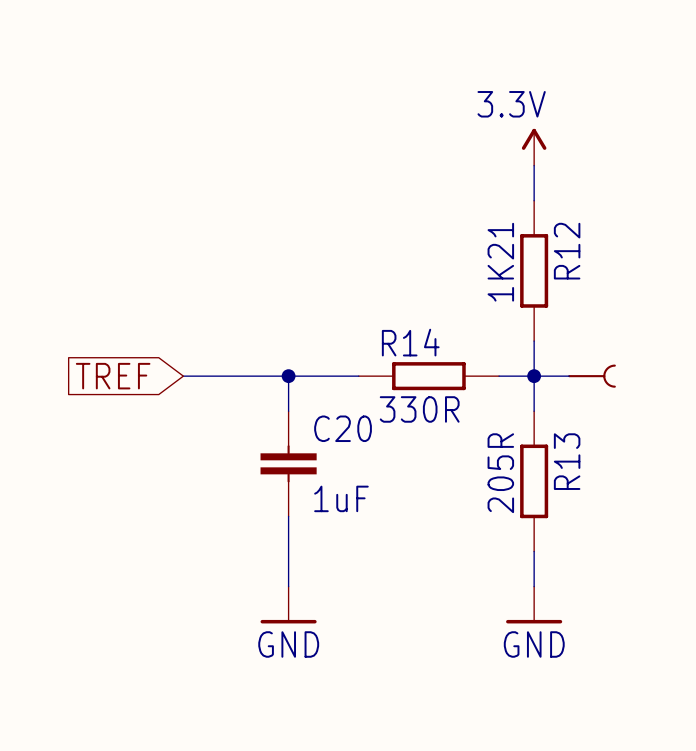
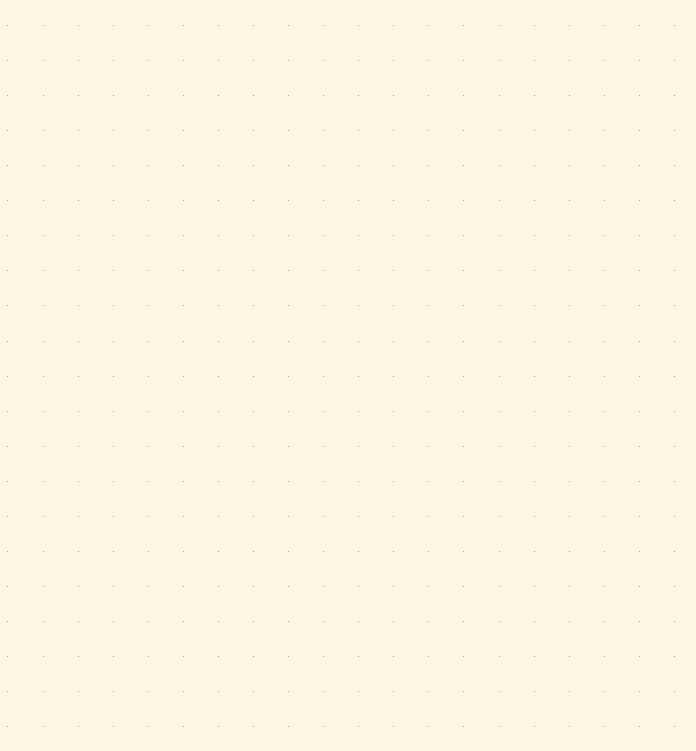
power symbol: 3.3V (534, 147) -> none
wire: (534, 165) (534, 200) -> none
R12: 1K21 (534, 270) -> none
wire: (534, 341) (534, 411) -> none
global label: TREF (113, 376) -> none
wire: (183, 376) (358, 376) -> none
wire: (288, 376) (288, 411) -> none
junction: (288, 376) -> none
R14: 330R (428, 376) -> none
wire: (499, 376) (569, 376) -> none
junction: (534, 376) -> none
part: (592, 376) -> none
C20: 1uF (288, 463) -> none
R13: 205R (534, 481) -> none
wire: (288, 516) (288, 586) -> none
wire: (534, 551) (534, 586) -> none
power symbol: GND (288, 605) -> none
power symbol: GND (534, 605) -> none

